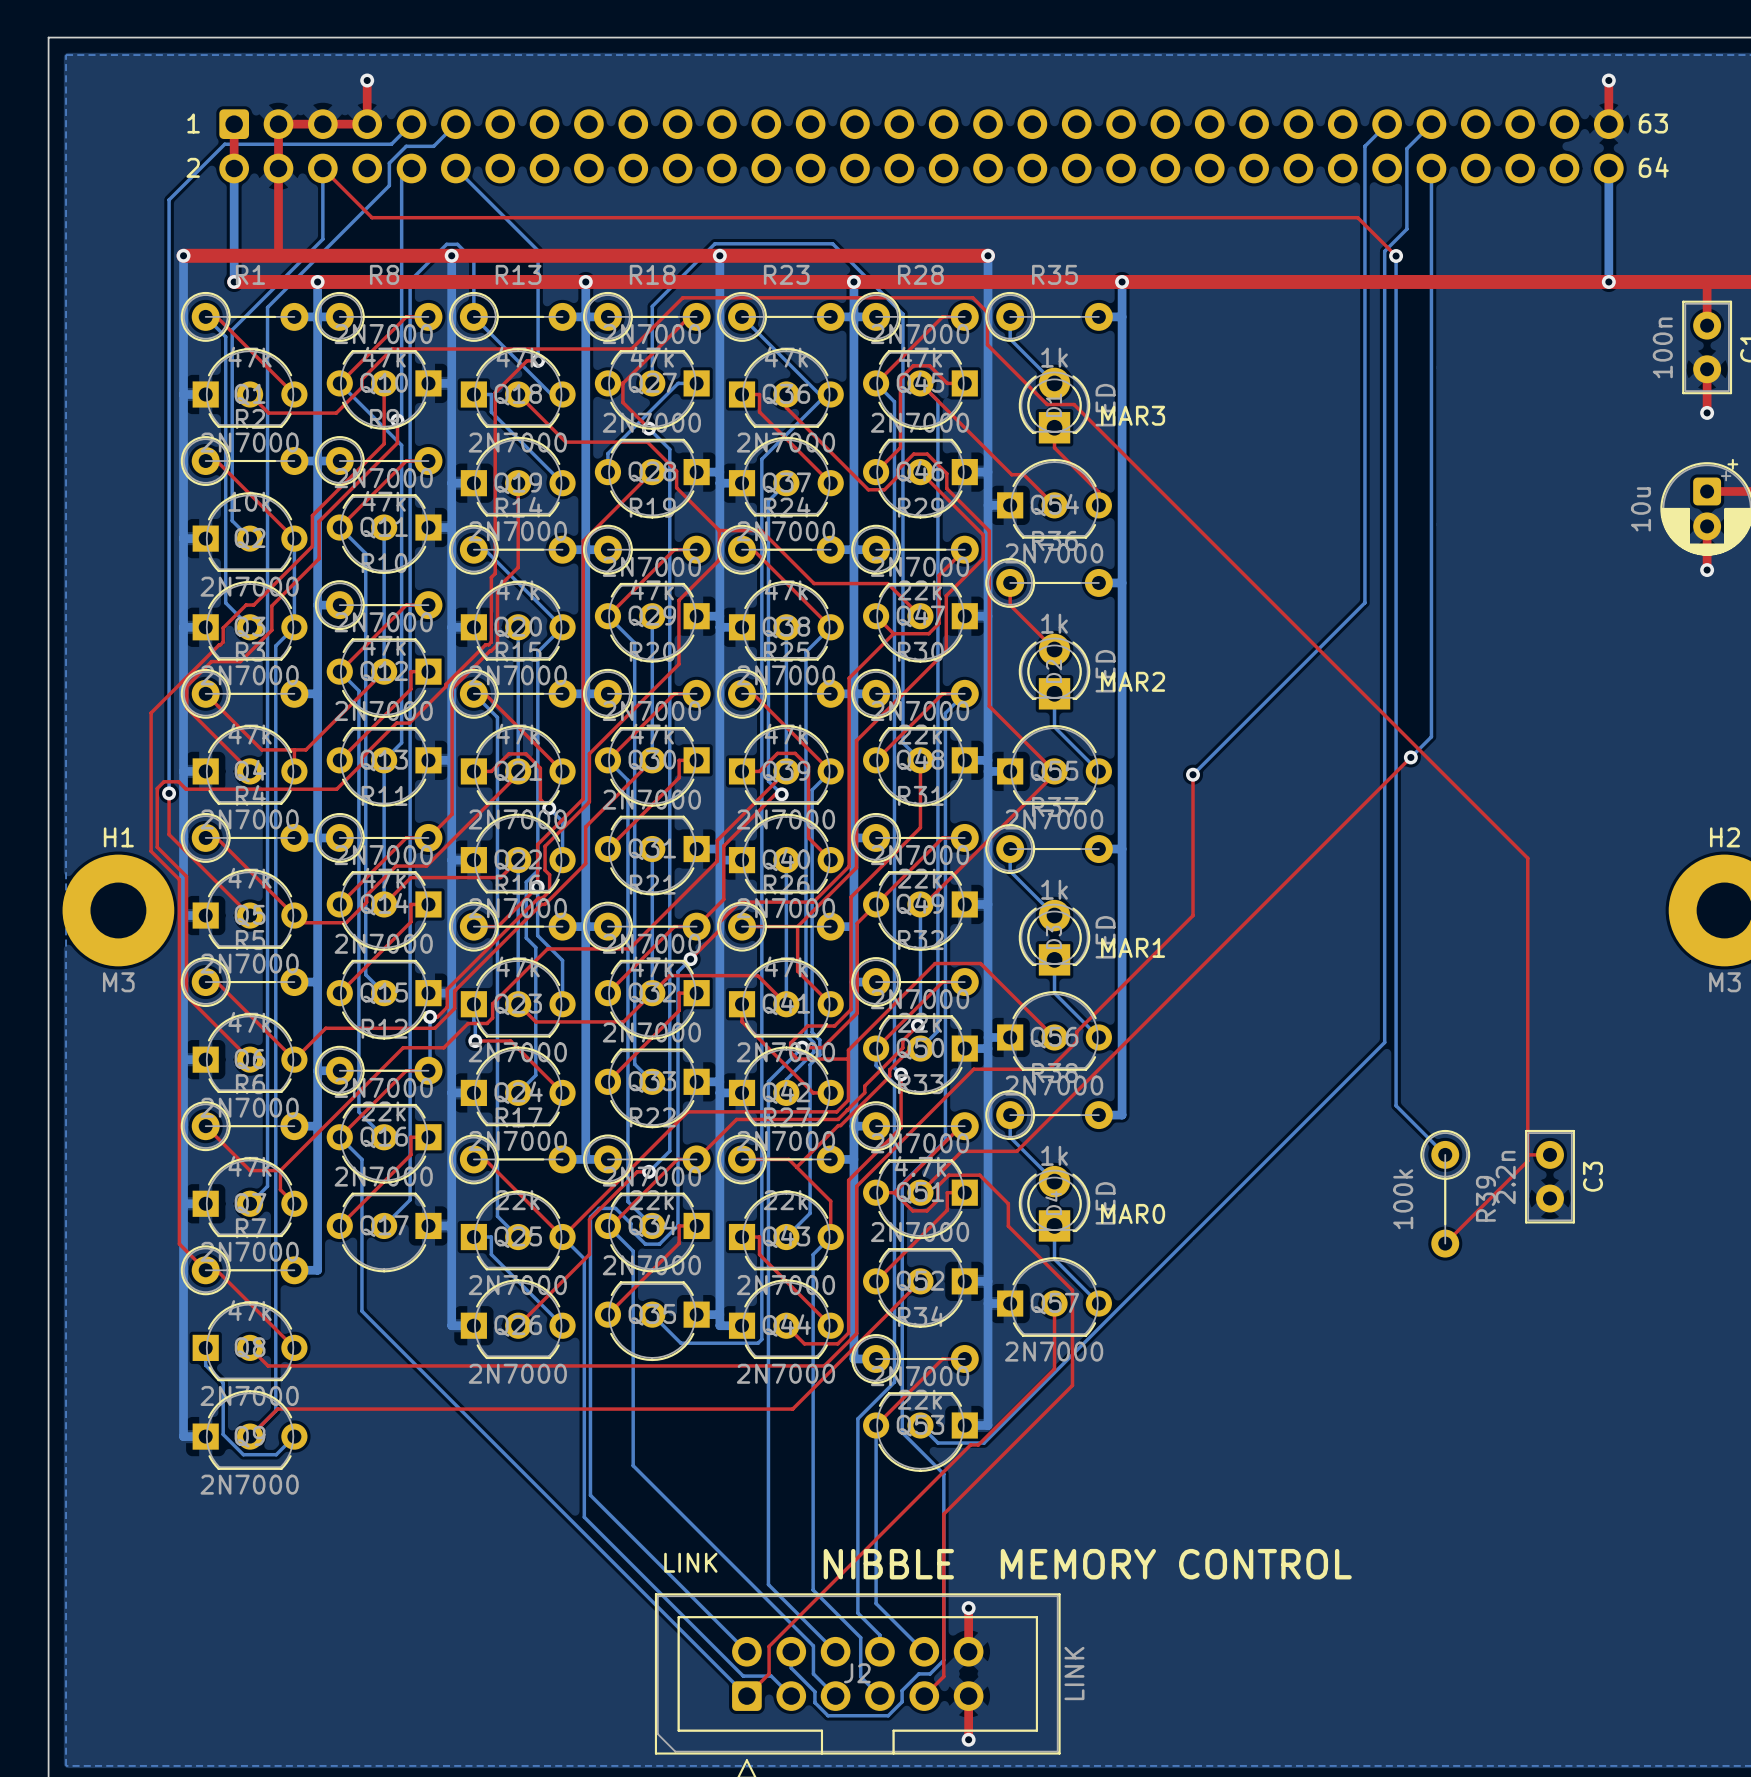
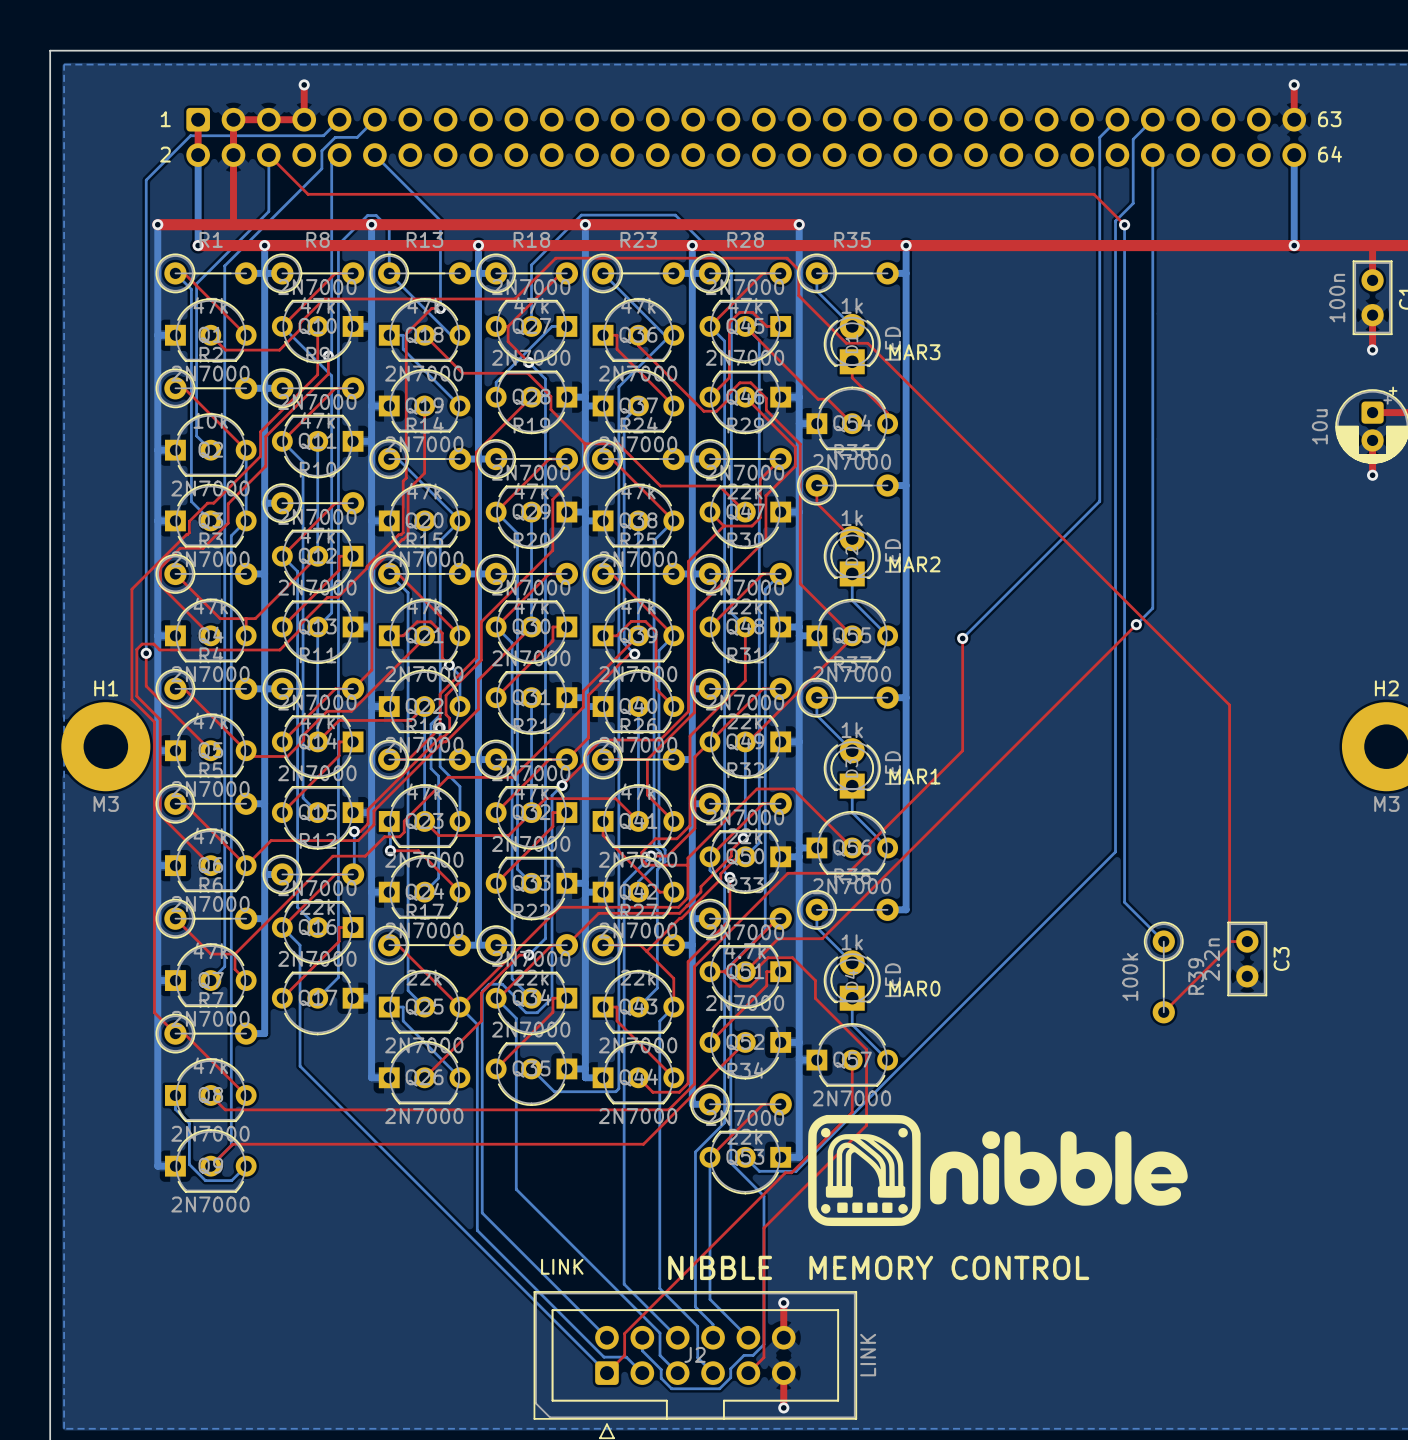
drawing: none -> [808, 1114, 1188, 1227]

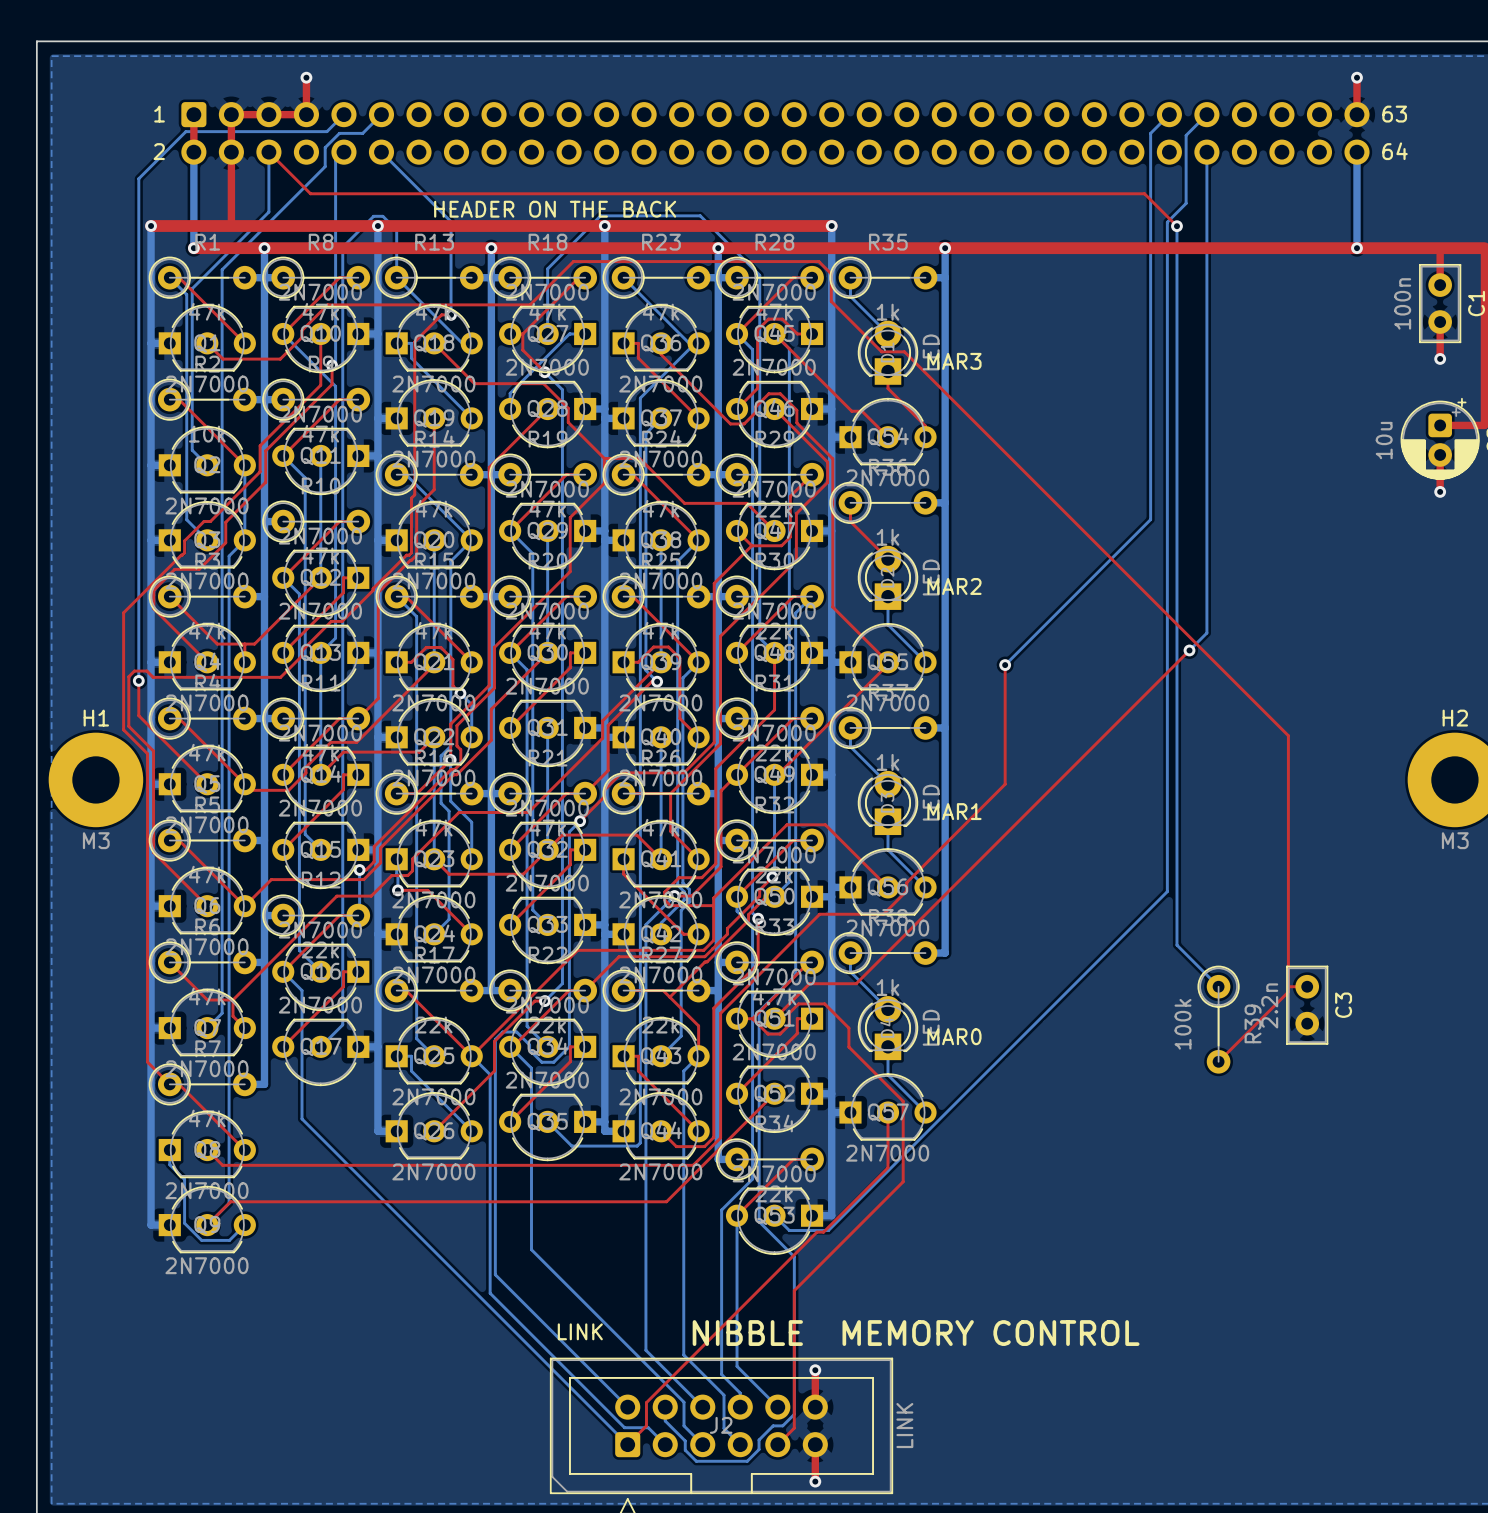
text: none -> HEADER ON THE BACK (555, 209)
drawing: [808, 1114, 1188, 1227] -> none

